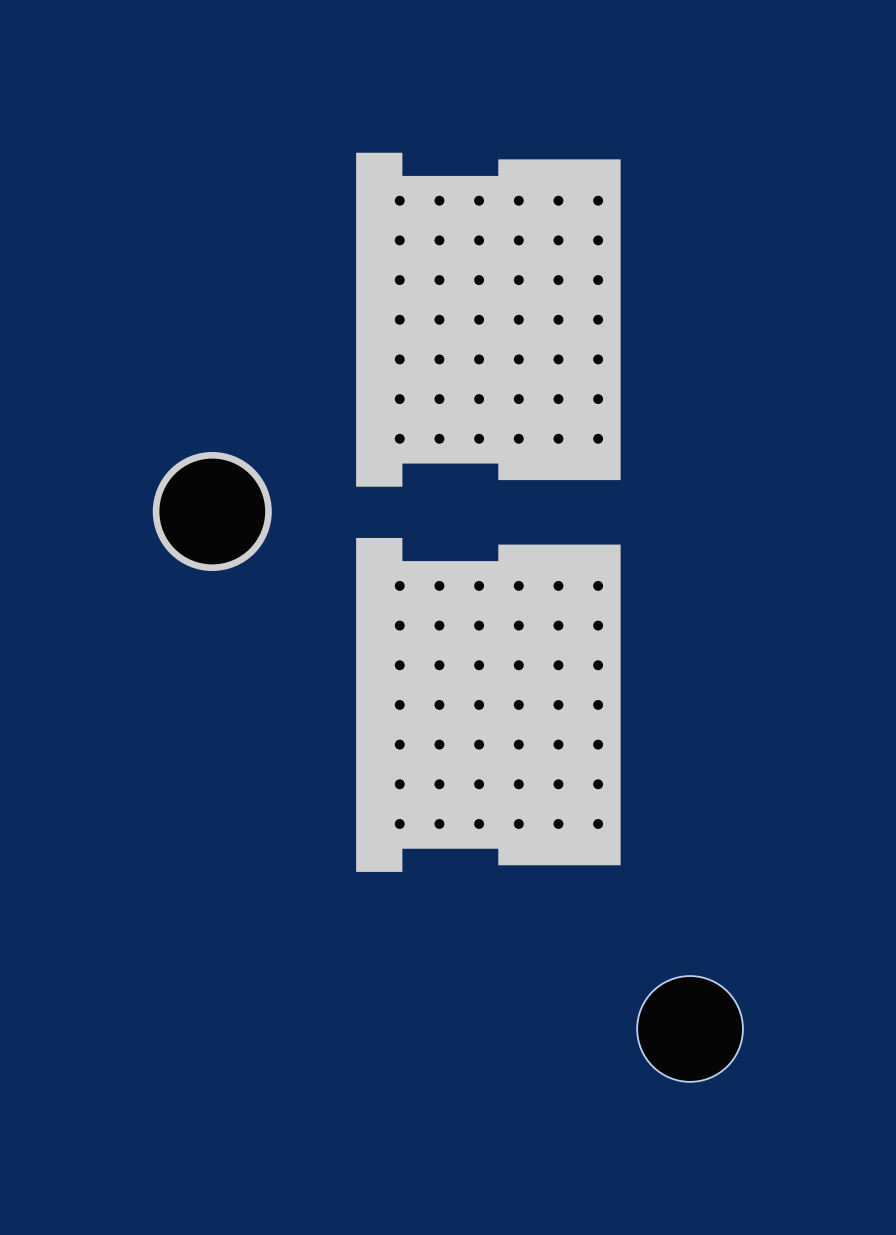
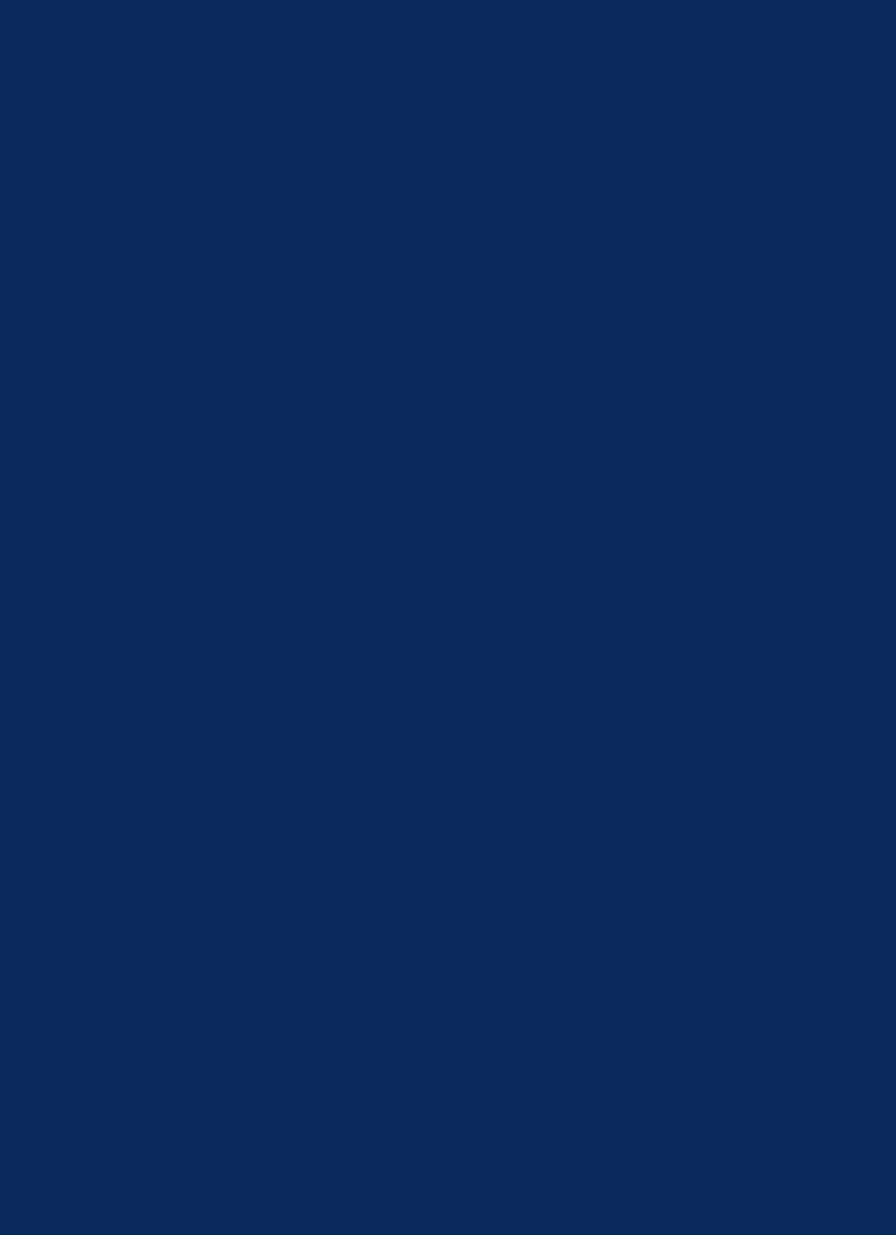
part: (488, 319) -> none
part: (212, 511) -> none
part: (488, 704) -> none
part: (690, 1028) -> none

